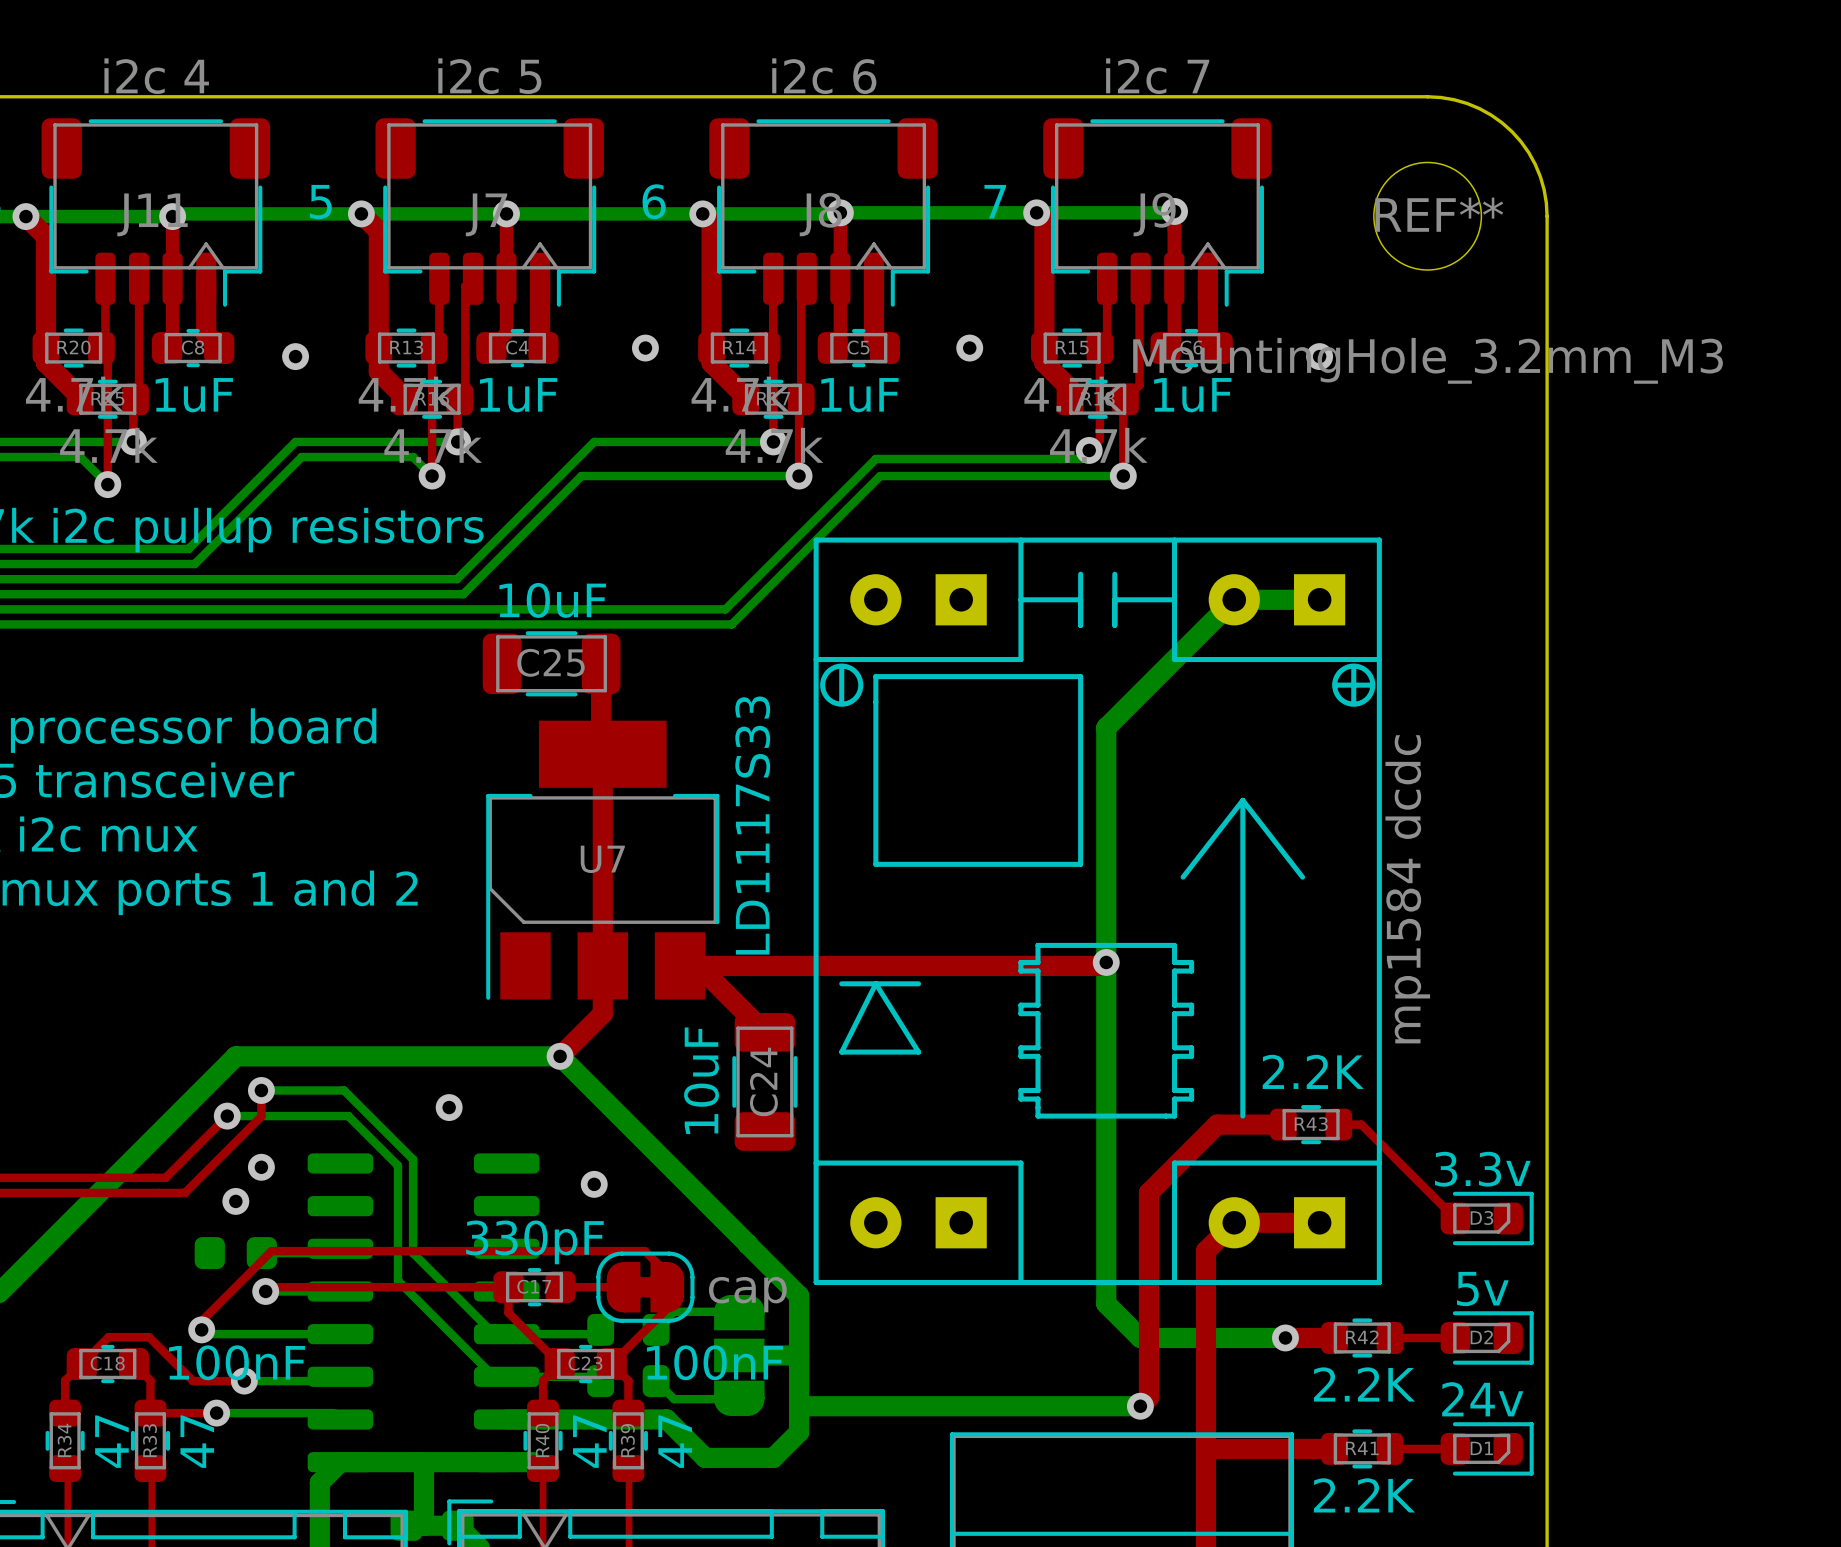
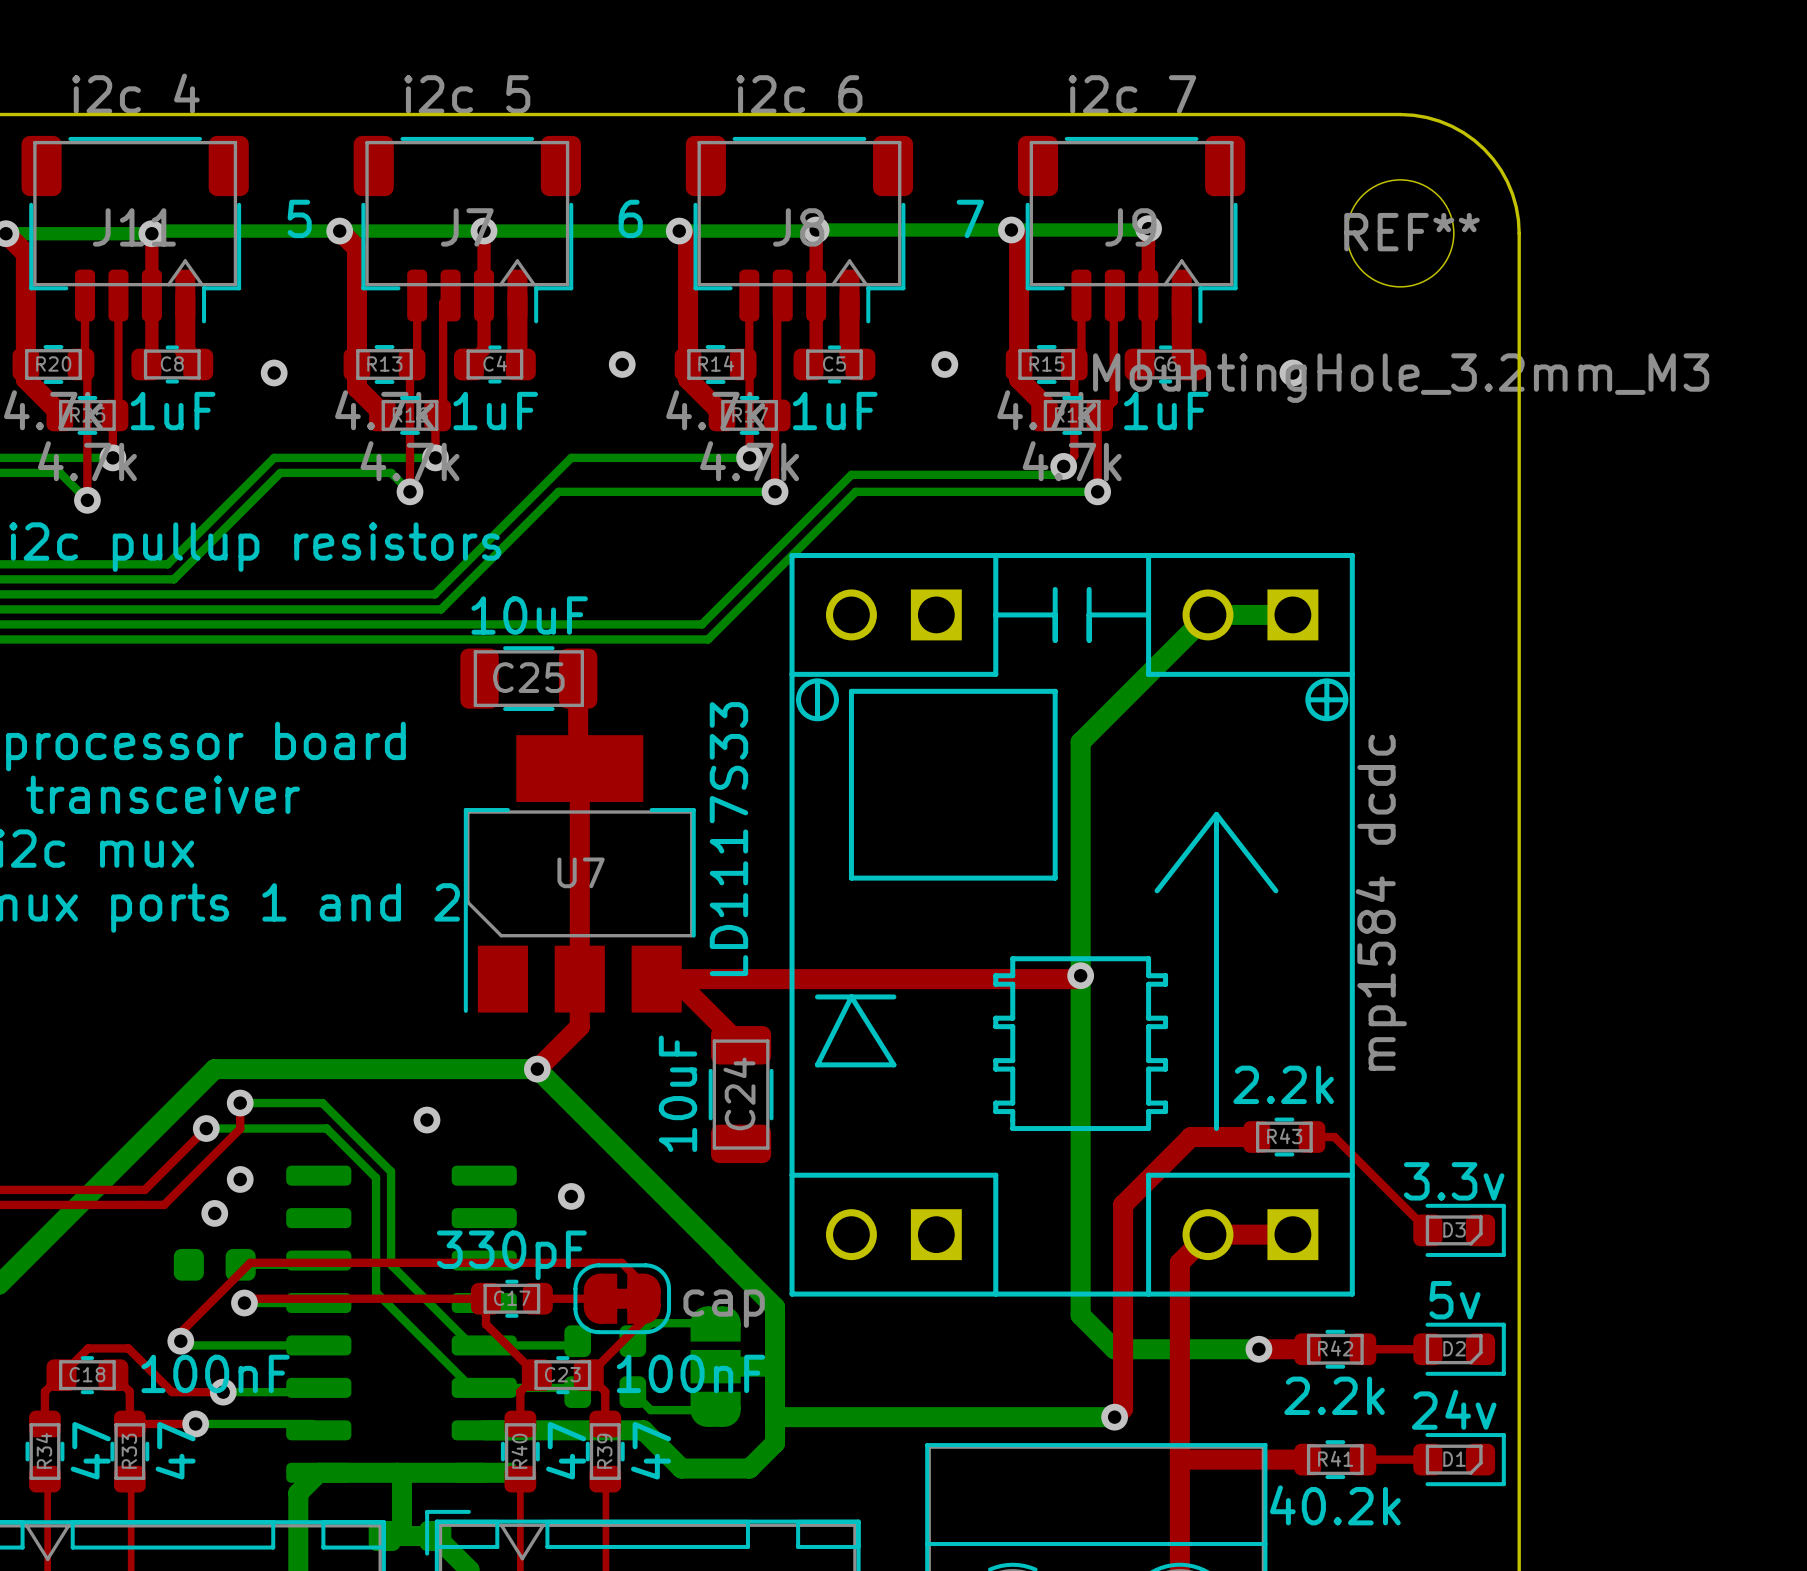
part footprint: [813, 537, 1382, 1286] -> [789, 552, 1355, 1297]
R43 value: 2.2K (1313, 1071) -> 2.2k (1283, 1084)
R42 value: 2.2K (1364, 1384) -> 2.2k (1334, 1395)
R41 value: 2.2K (1364, 1495) -> 40.2k (1335, 1505)

